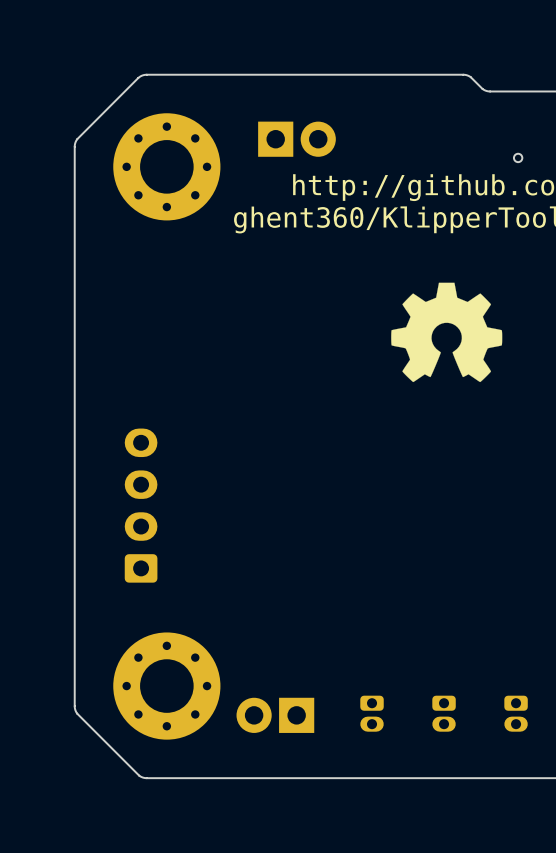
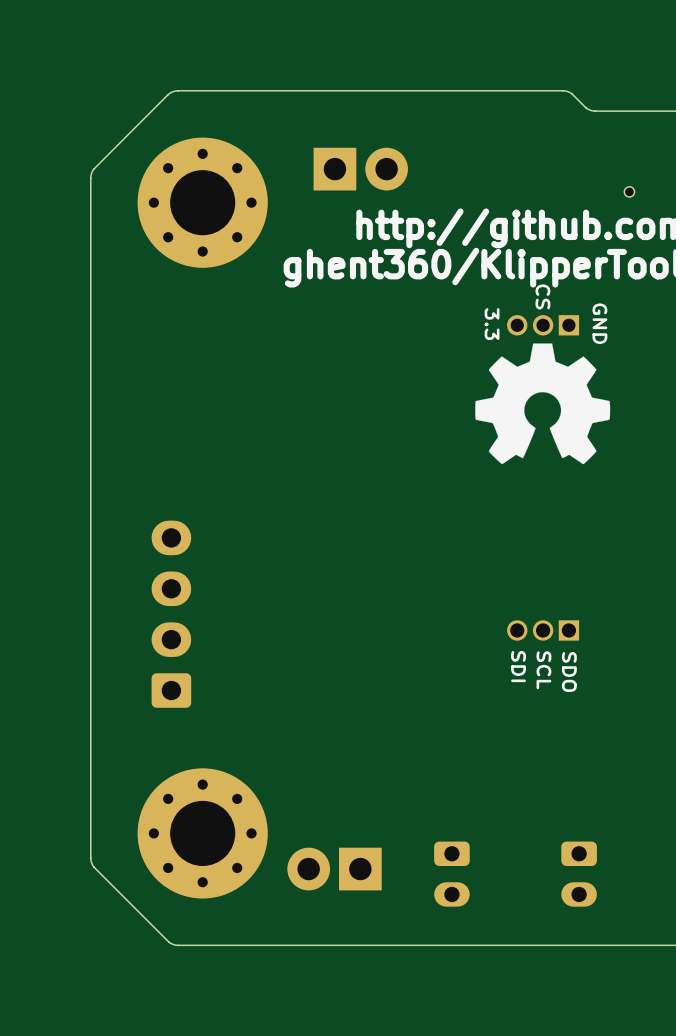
text: none -> CS (542, 296)
text: none -> 3.3 (492, 324)
part: none -> (543, 325)
text: none -> GND (599, 323)
part: none -> (543, 630)
text: none -> SDI (518, 666)
text: none -> SCL (543, 670)
text: none -> SDO (569, 671)
part footprint: [360, 695, 384, 732] -> [434, 841, 470, 907]
part: (444, 713) -> none
part: (516, 713) -> none
part: none -> (579, 874)

